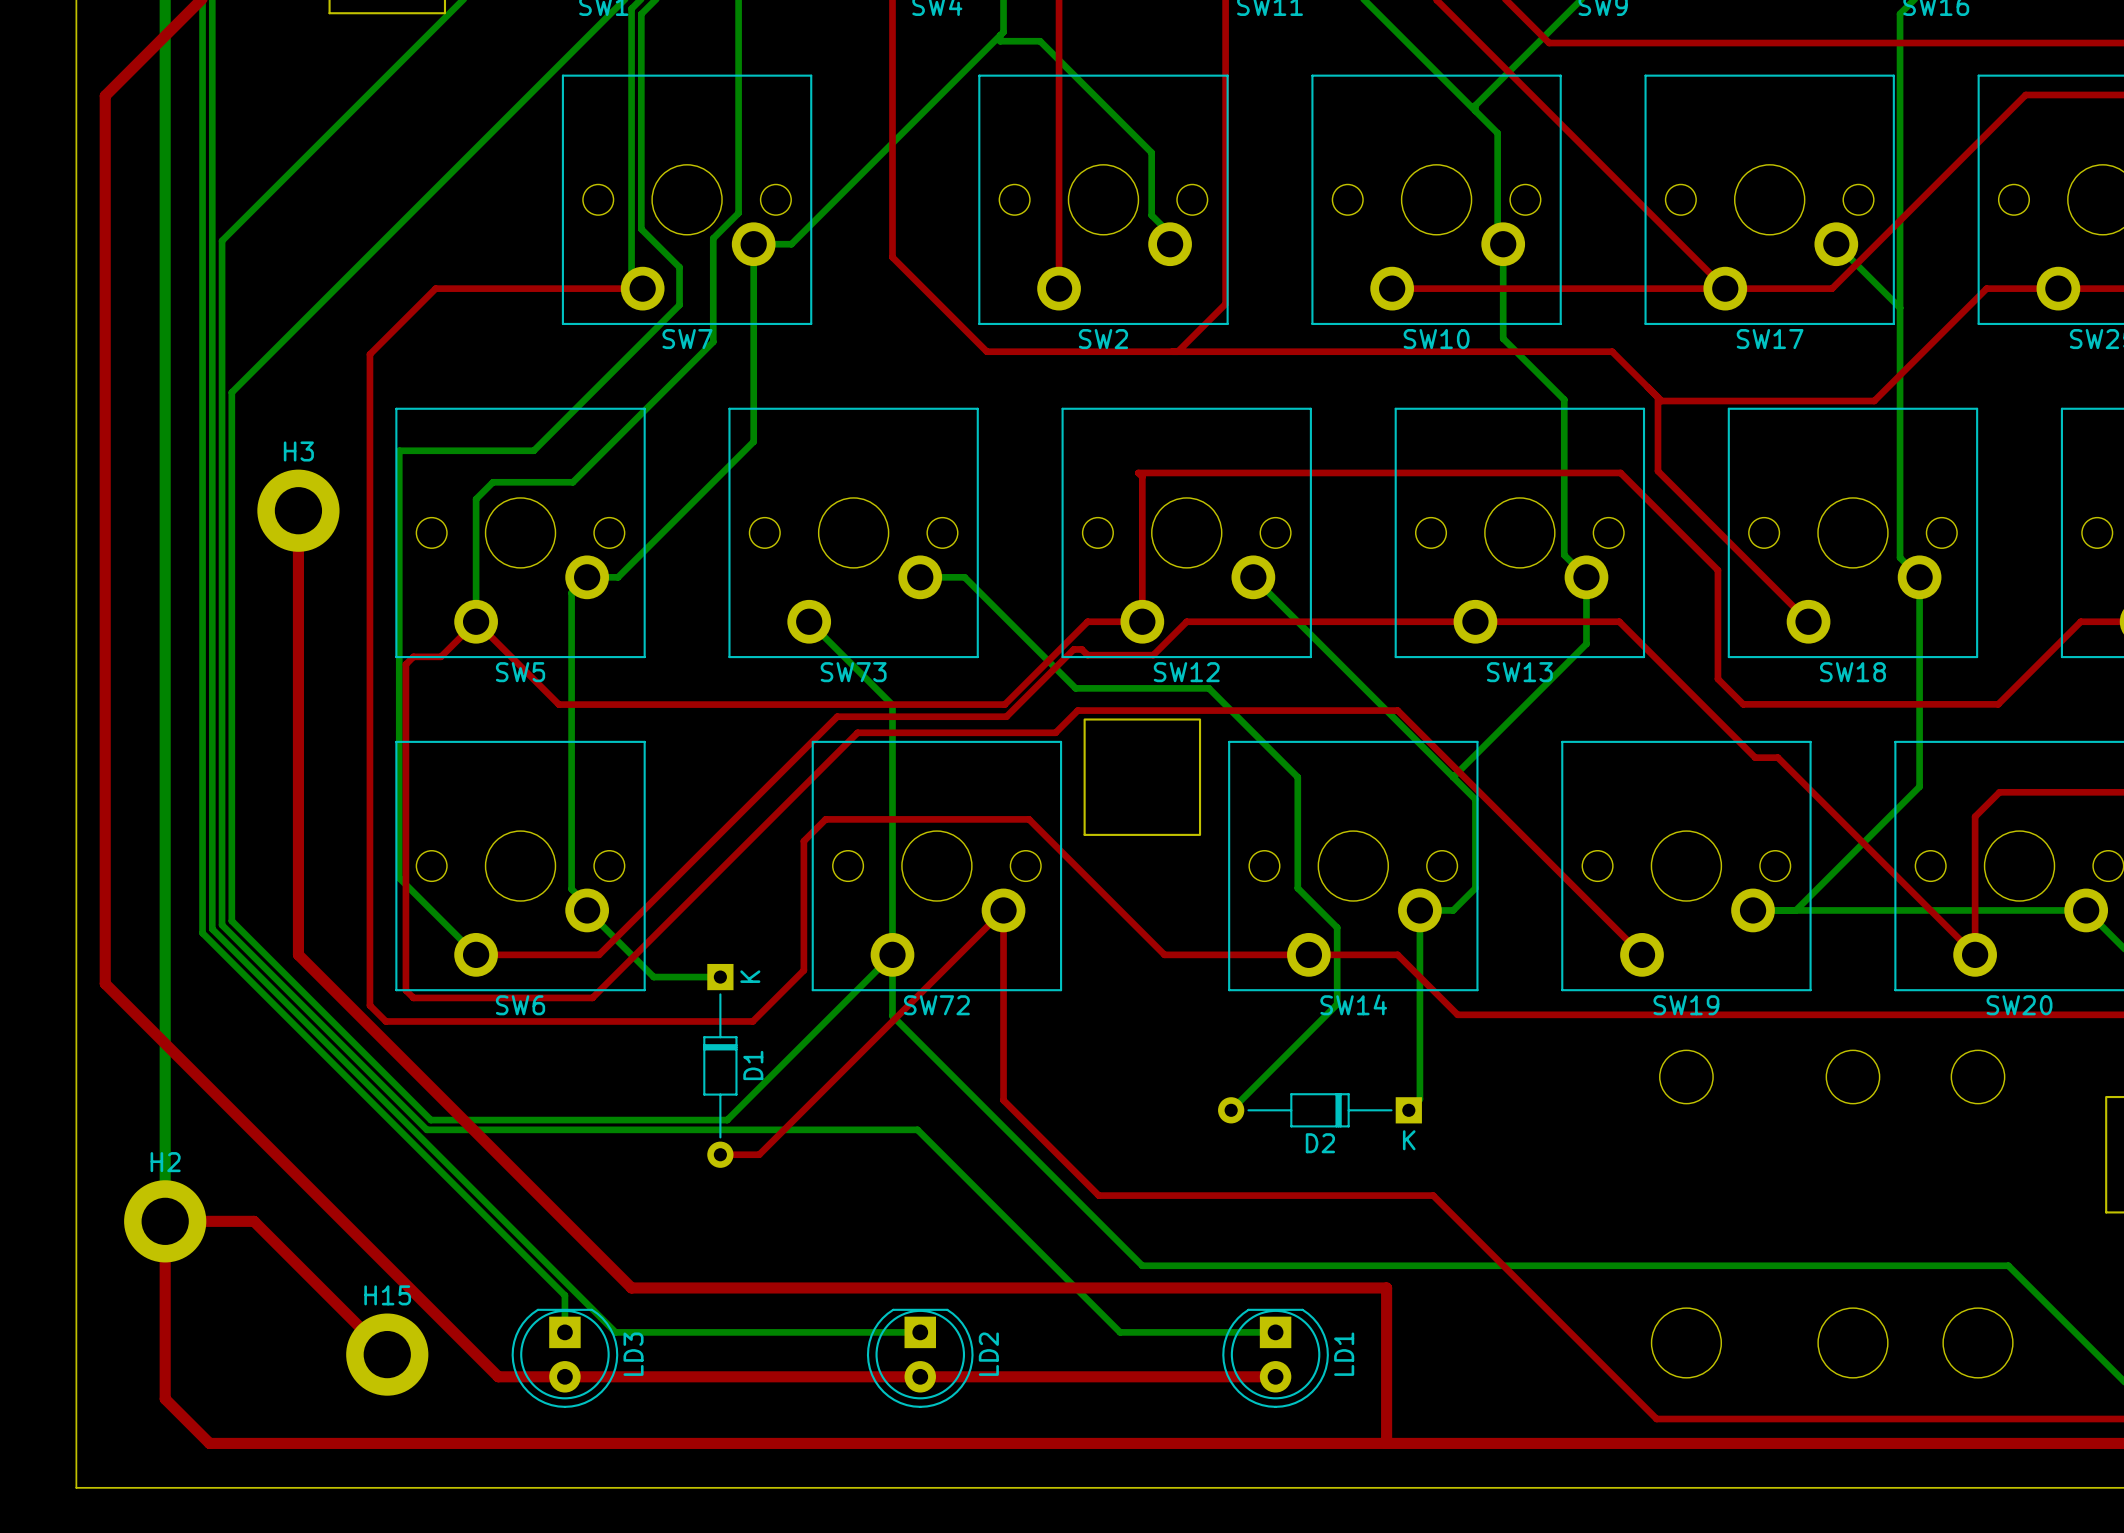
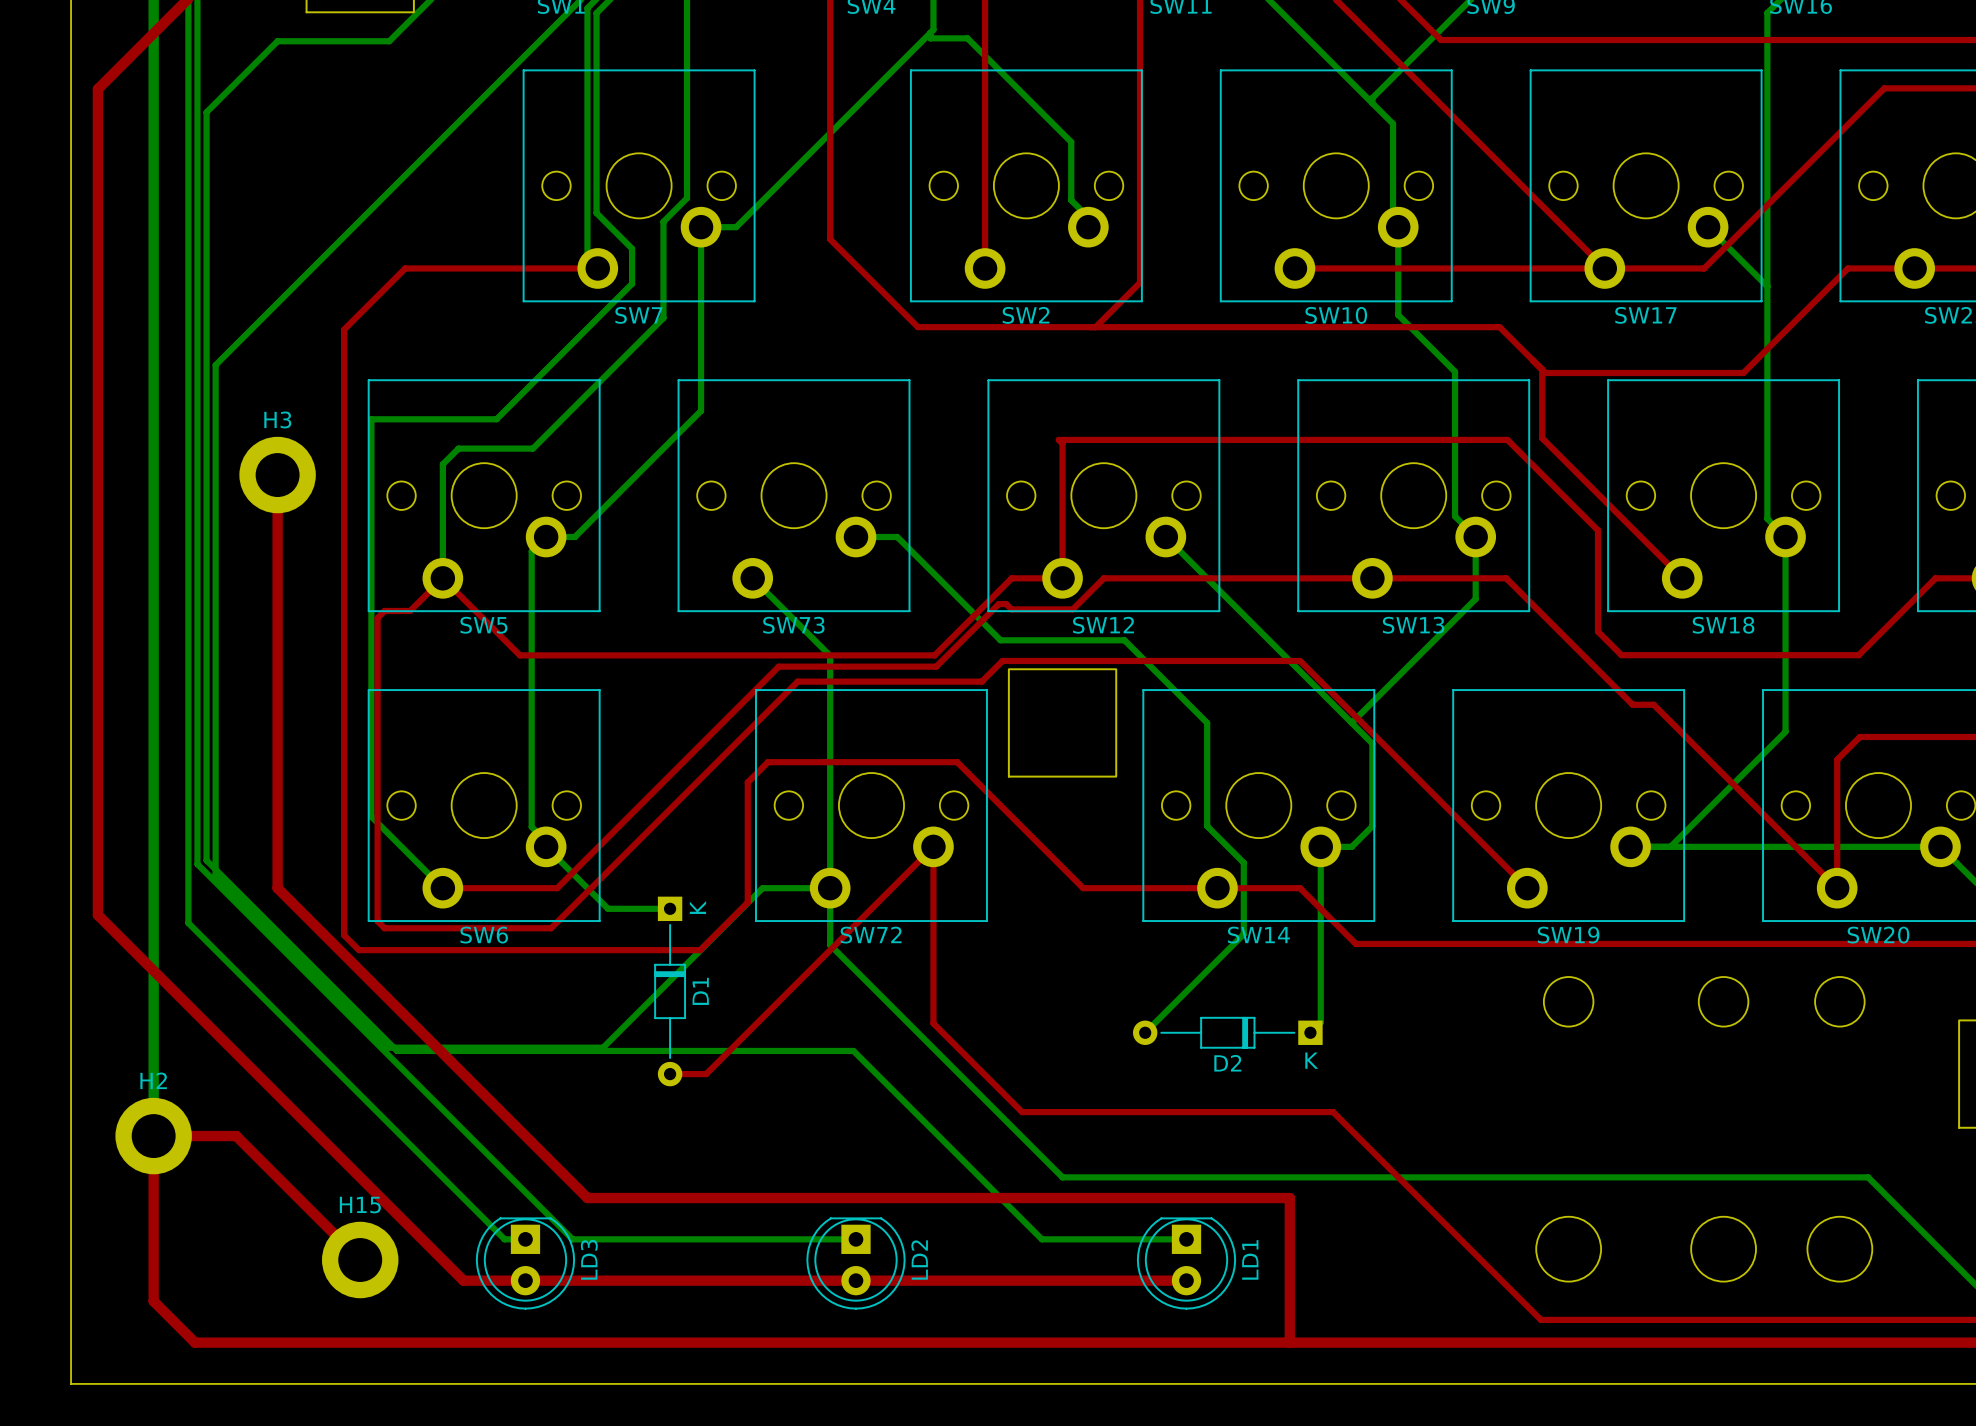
bottom track: (418, 44) (222, 240) -> (389, 41) (277, 41) (206, 112) (206, 224)
bottom track: (231, 920) (430, 1120) (727, 1120) (892, 954) -> (215, 856) (215, 874) (388, 1047) (603, 1047) (762, 888) (830, 888)
bottom track: (202, 933) (564, 1295) (564, 1332) -> (188, 867) (188, 923) (504, 1239) (525, 1239)

